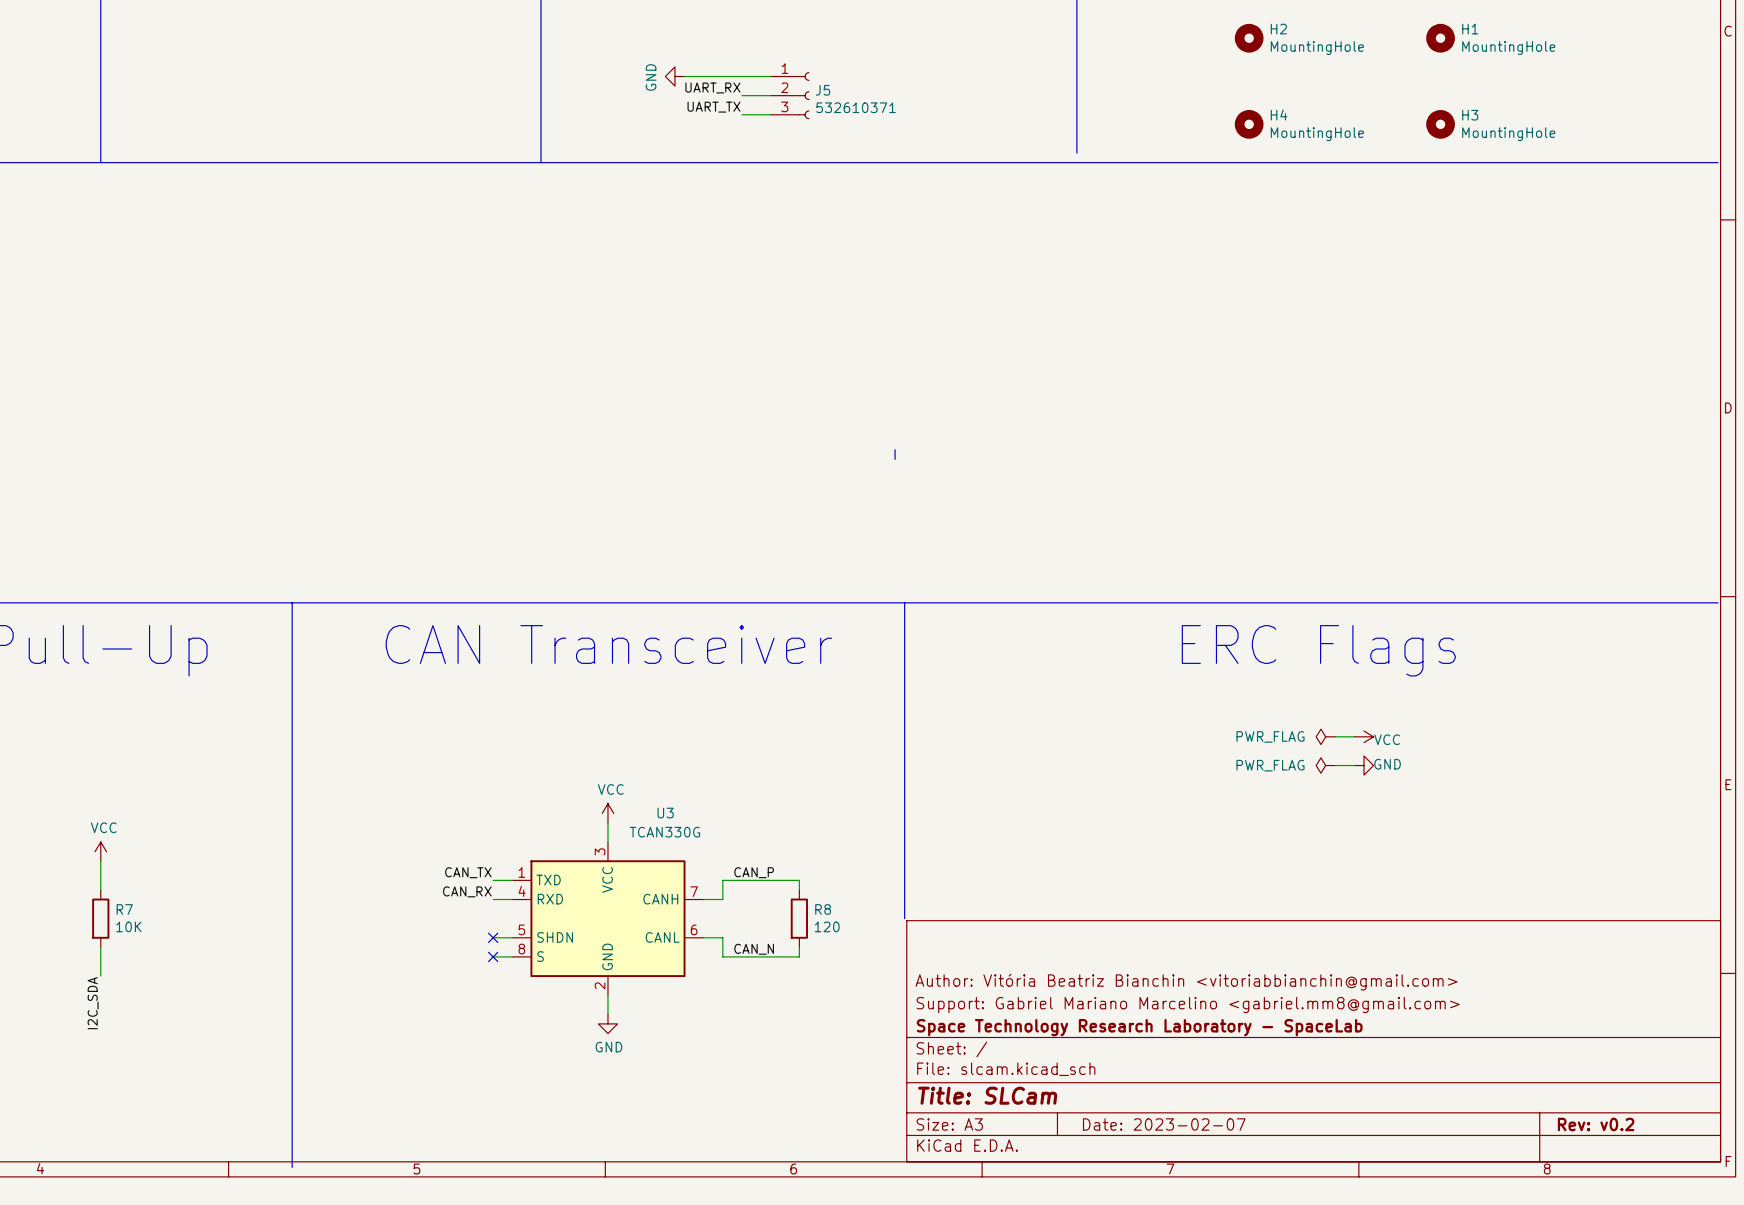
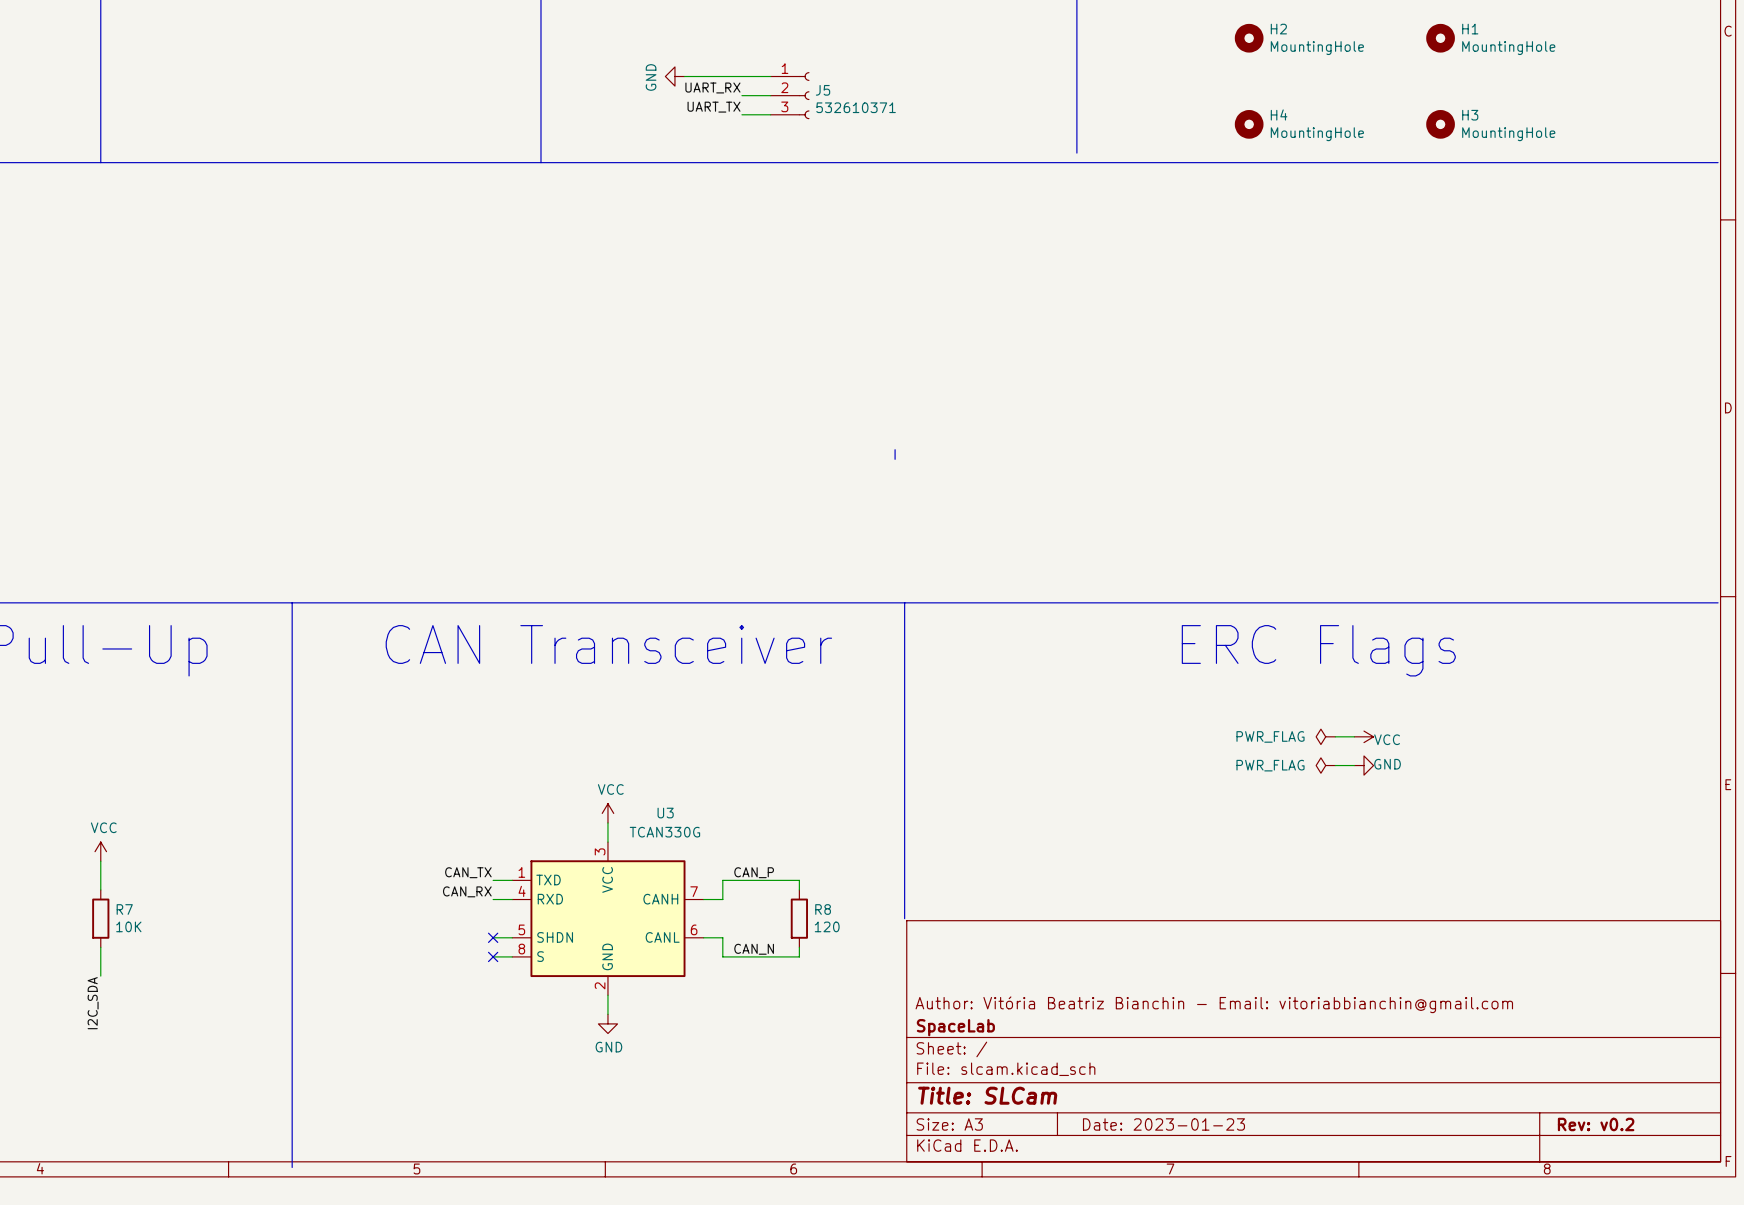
title block: Author: Vitória Beatriz Bianchin <vitoriabbianchin@gmail.com> (1186, 982) -> none
title block: Support: Gabriel Mariano Marcelino <gabriel.mm8@gmail.com> (1188, 1005) -> Author: Vitória Beatriz Bianchin - Email: vitoriabbianchin@gmail.com (1214, 1004)
title block: Space Technology Research Laboratory - SpaceLab (1139, 1027) -> SpaceLab (955, 1027)
title block: Date: 2023-02-07 (1164, 1124) -> Date: 2023-01-23 (1163, 1124)

